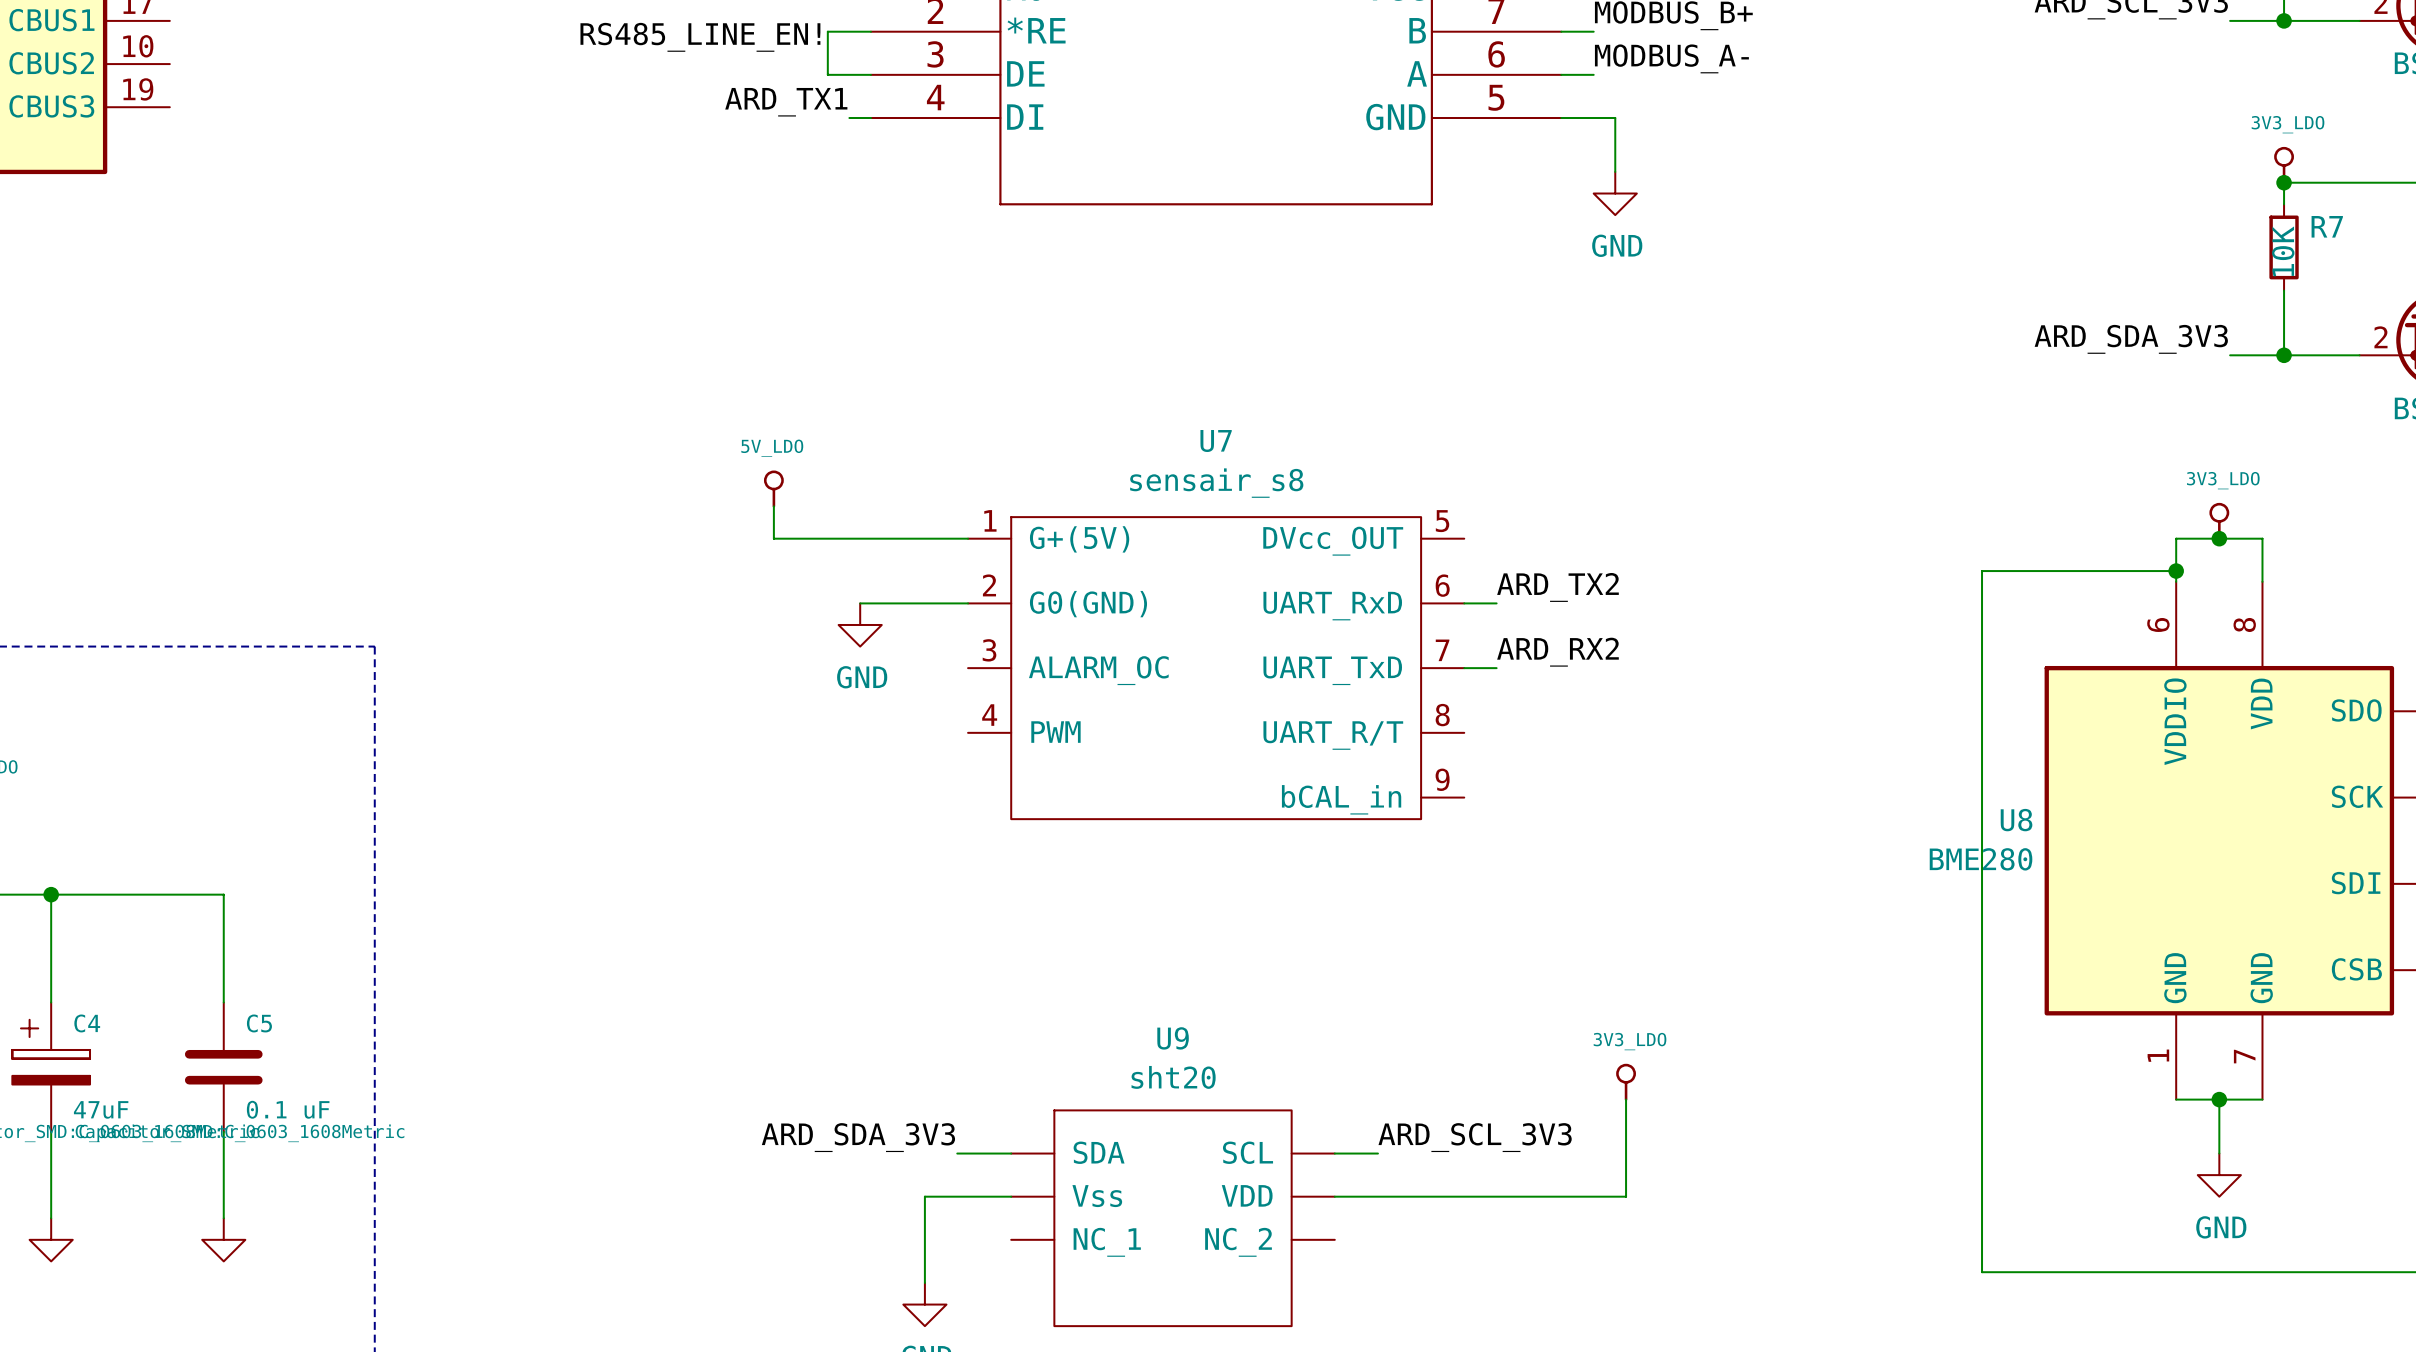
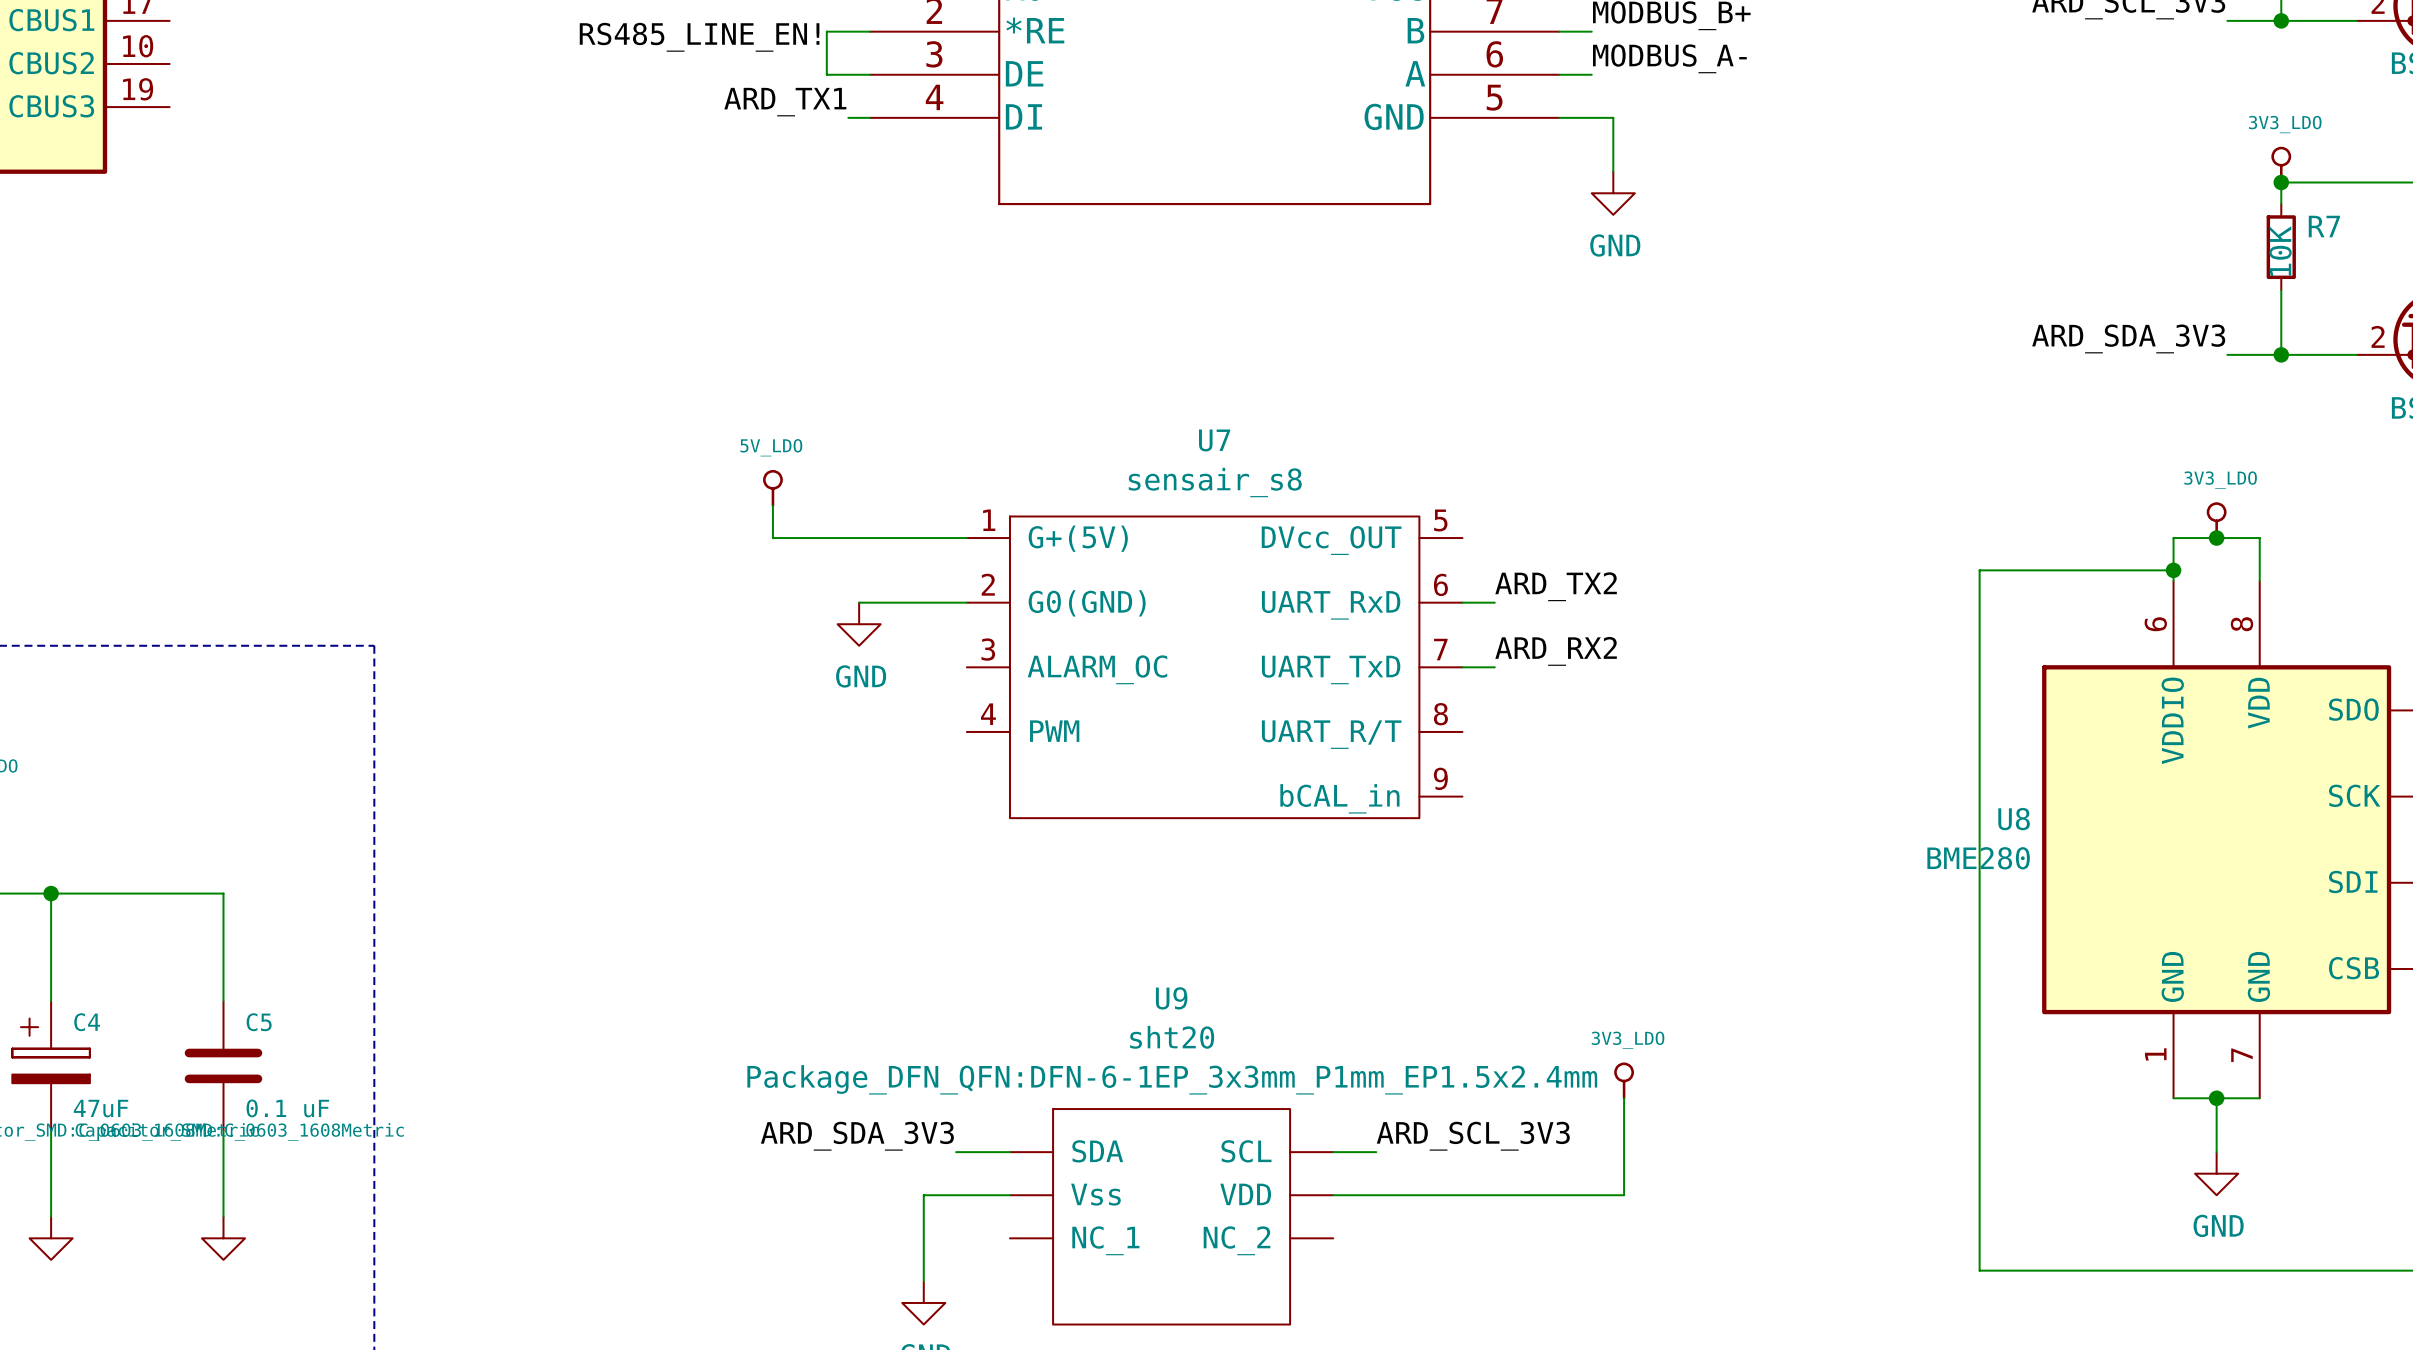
U9 name position: U9 (1173, 1038) -> U9 (1171, 998)
U9 value position: sht20 (1173, 1077) -> sht20 (1172, 1037)
U9 text: none -> Package_DFN_QFN:DFN-6-1EP_3x3mm_P1mm_EP1.5x2.4mm (1172, 1079)

